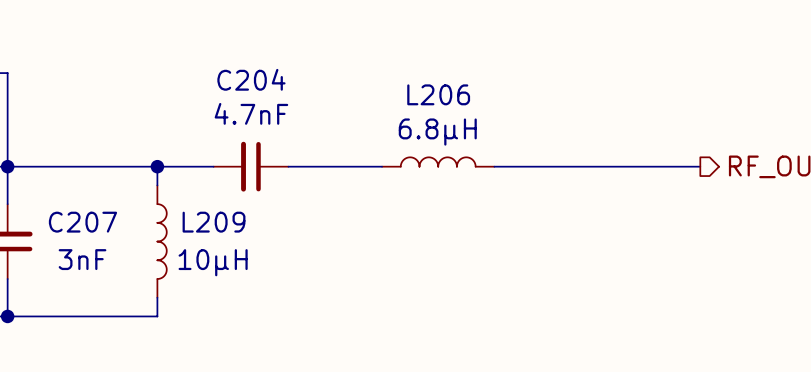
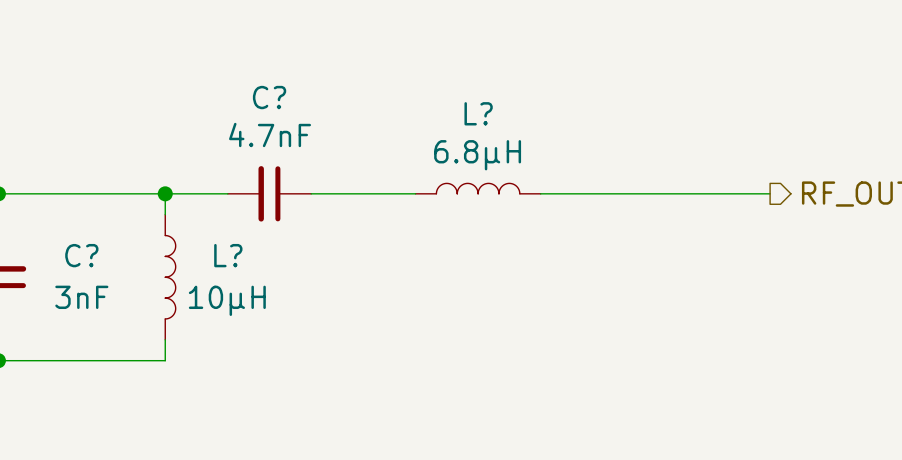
C204 name: C204 (251, 79) -> C? (269, 97)
L206 name: L206 (438, 94) -> L? (478, 113)
C207 name: C207 (82, 222) -> C? (81, 255)
L209 name: L209 (214, 222) -> L? (228, 255)

